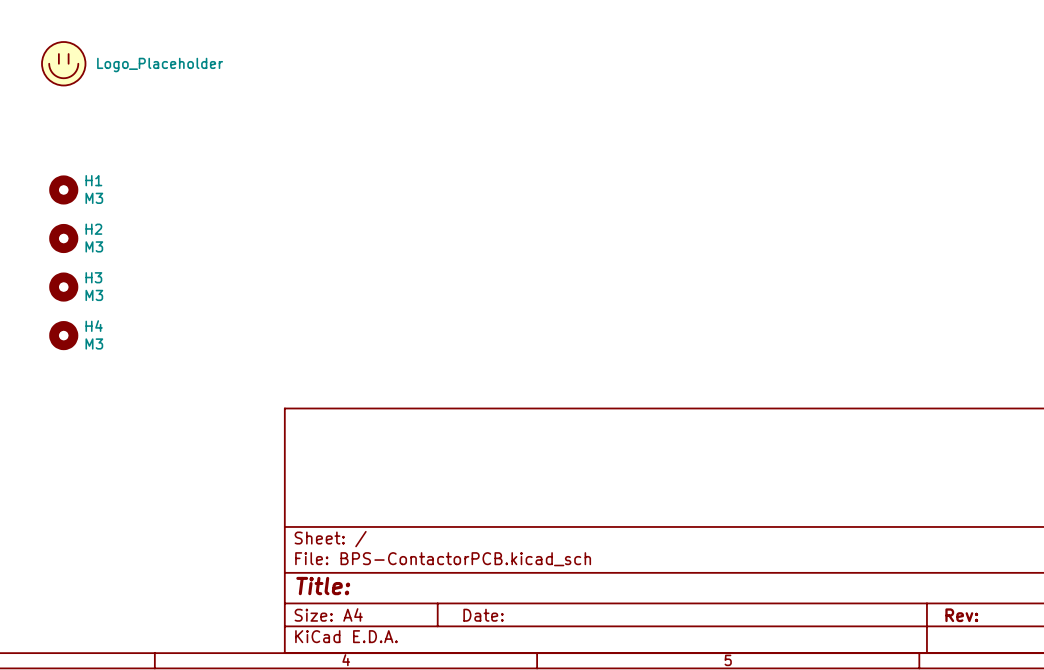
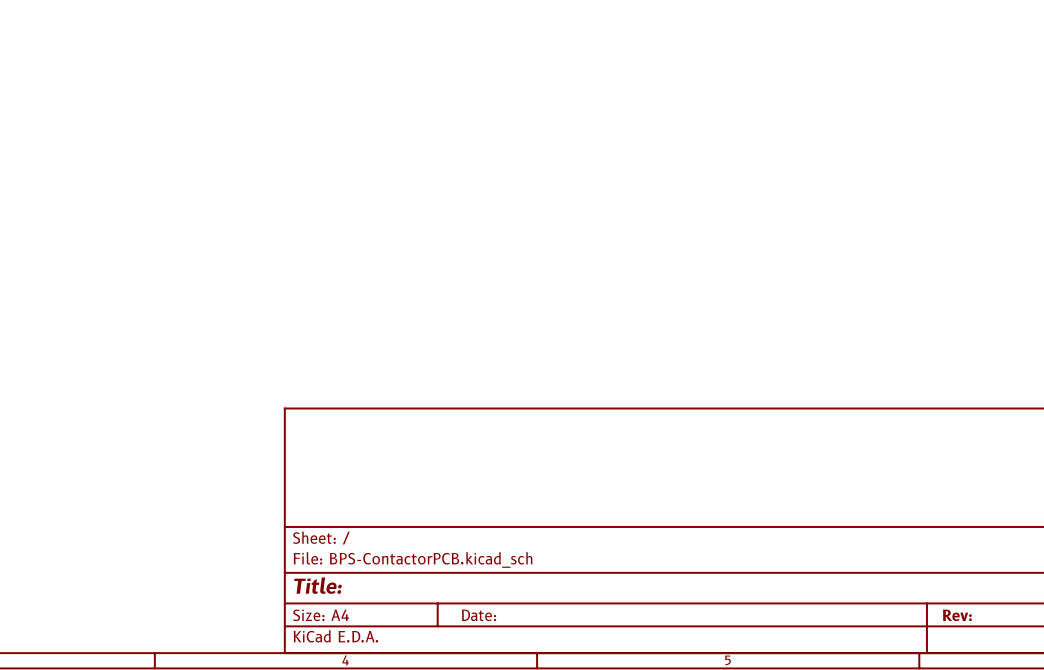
part: Logo_Placeholder (63, 63) -> none
H1: M3 (63, 189) -> none
H2: M3 (63, 238) -> none
H3: M3 (63, 287) -> none
H4: M3 (63, 335) -> none

